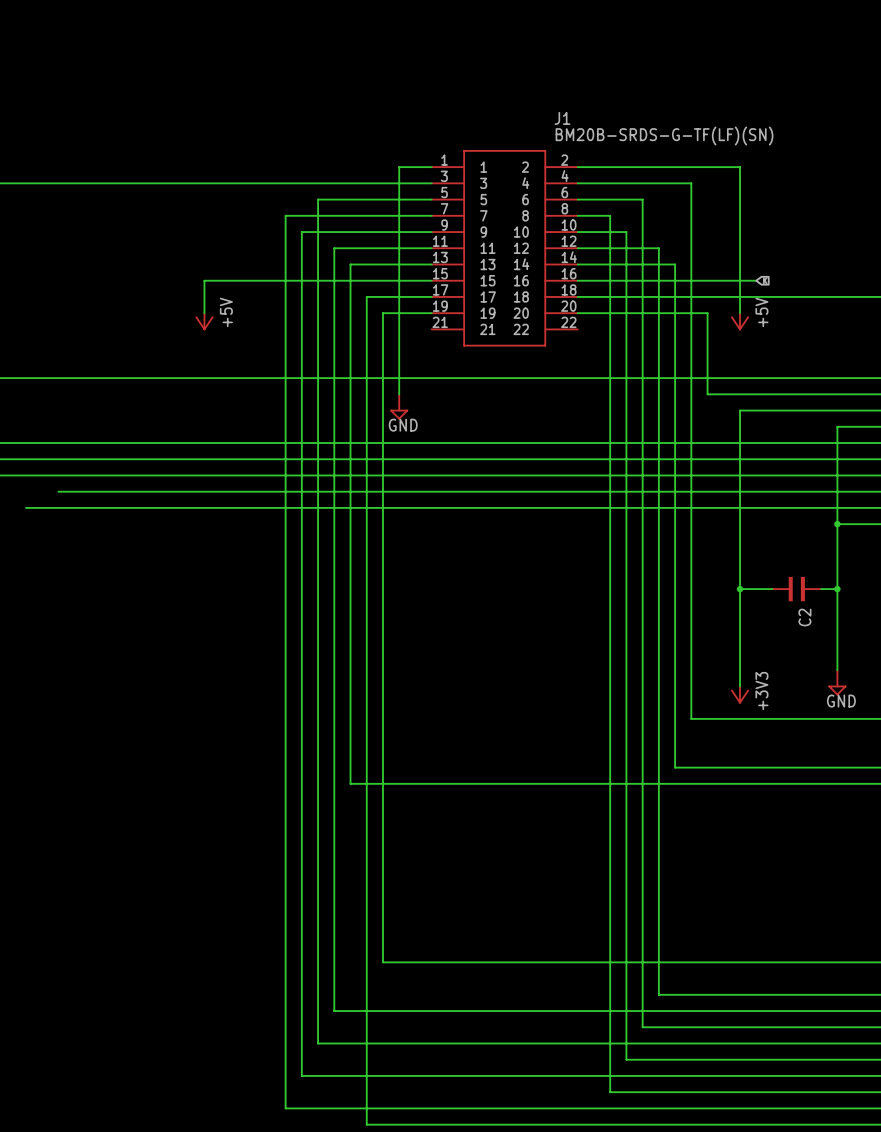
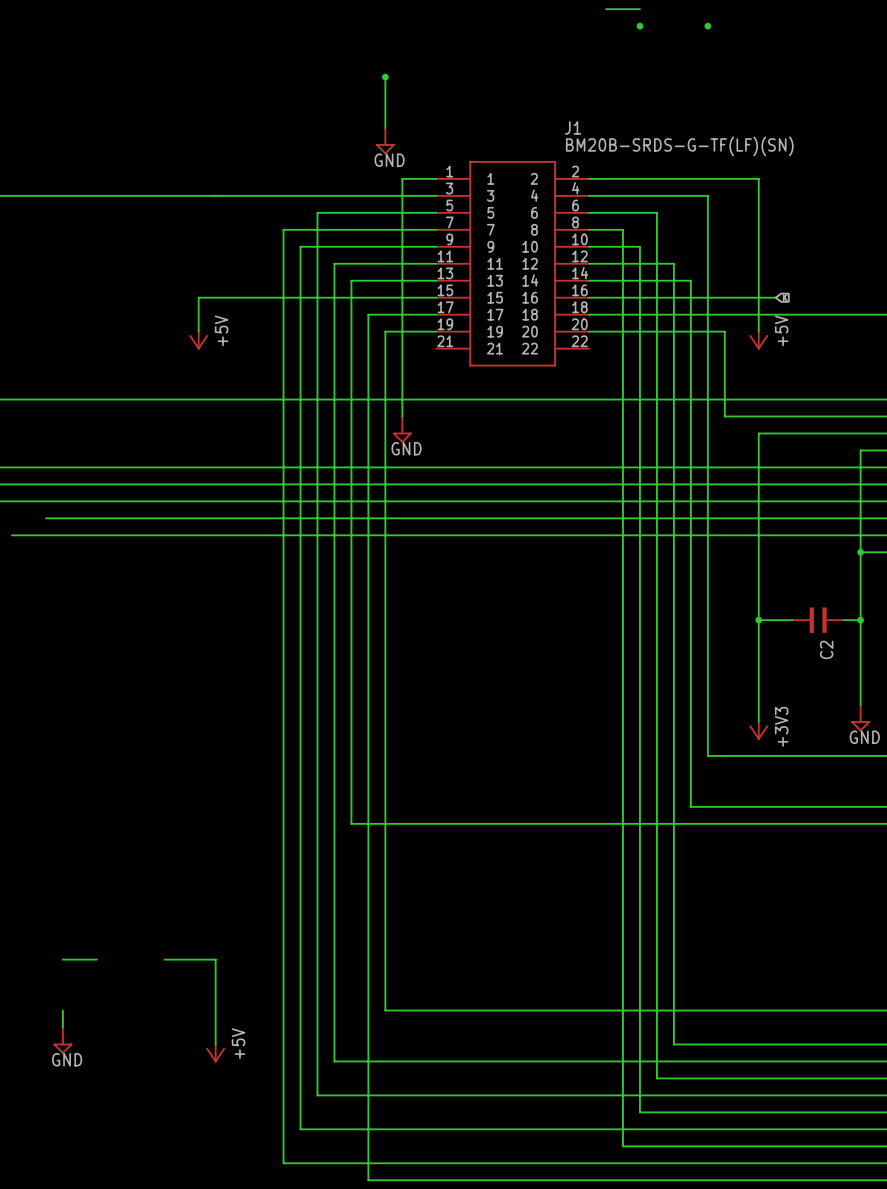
wire: none -> (606, 9) (639, 9)
junction: none -> (639, 26)
junction: none -> (707, 26)
wire: none -> (385, 77) (385, 127)
junction: none -> (385, 77)
power symbol: none -> GND (385, 141)
wire: none -> (62, 959) (96, 959)
wire: none -> (164, 959) (215, 959) (215, 1044)
wire: none -> (62, 1010) (62, 1027)
power symbol: none -> GND (62, 1040)
power symbol: none -> +5V (215, 1053)

